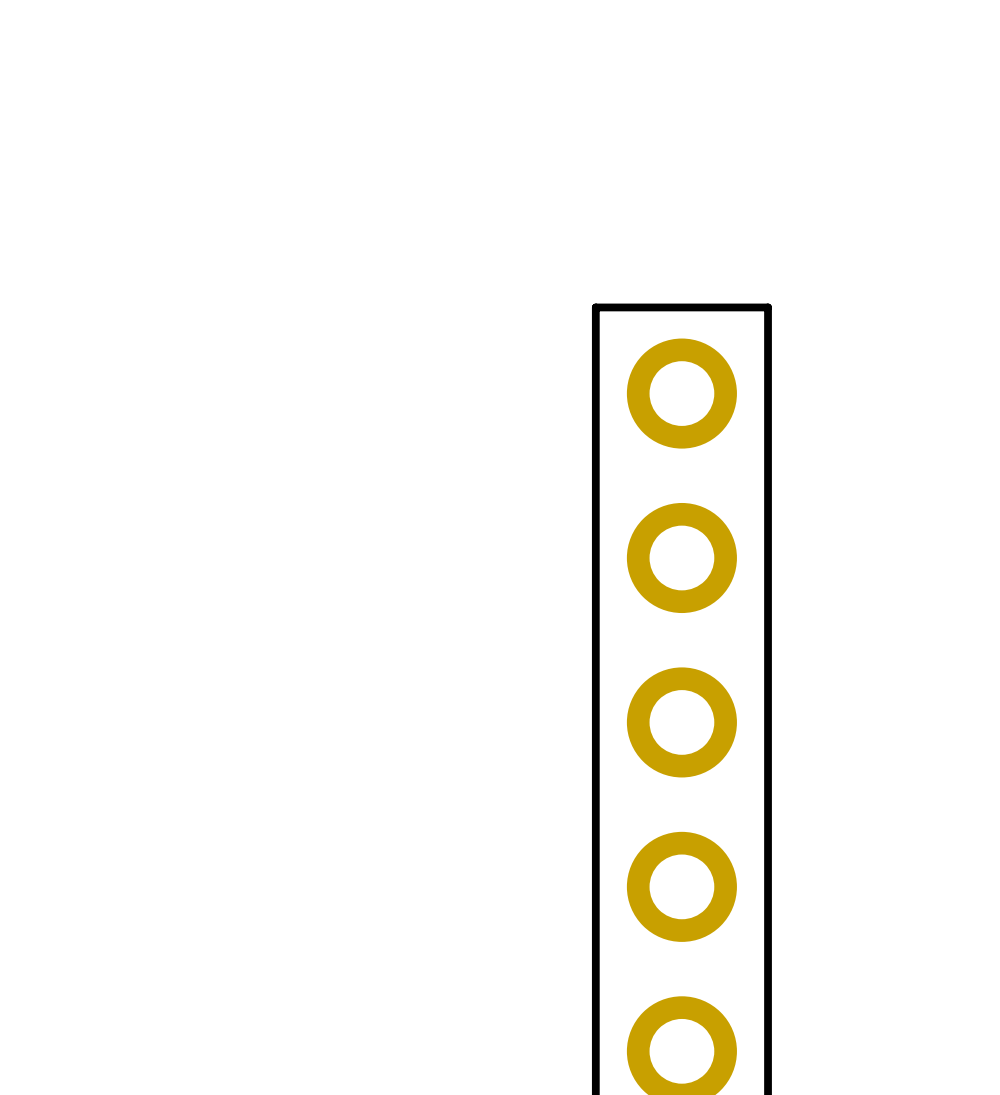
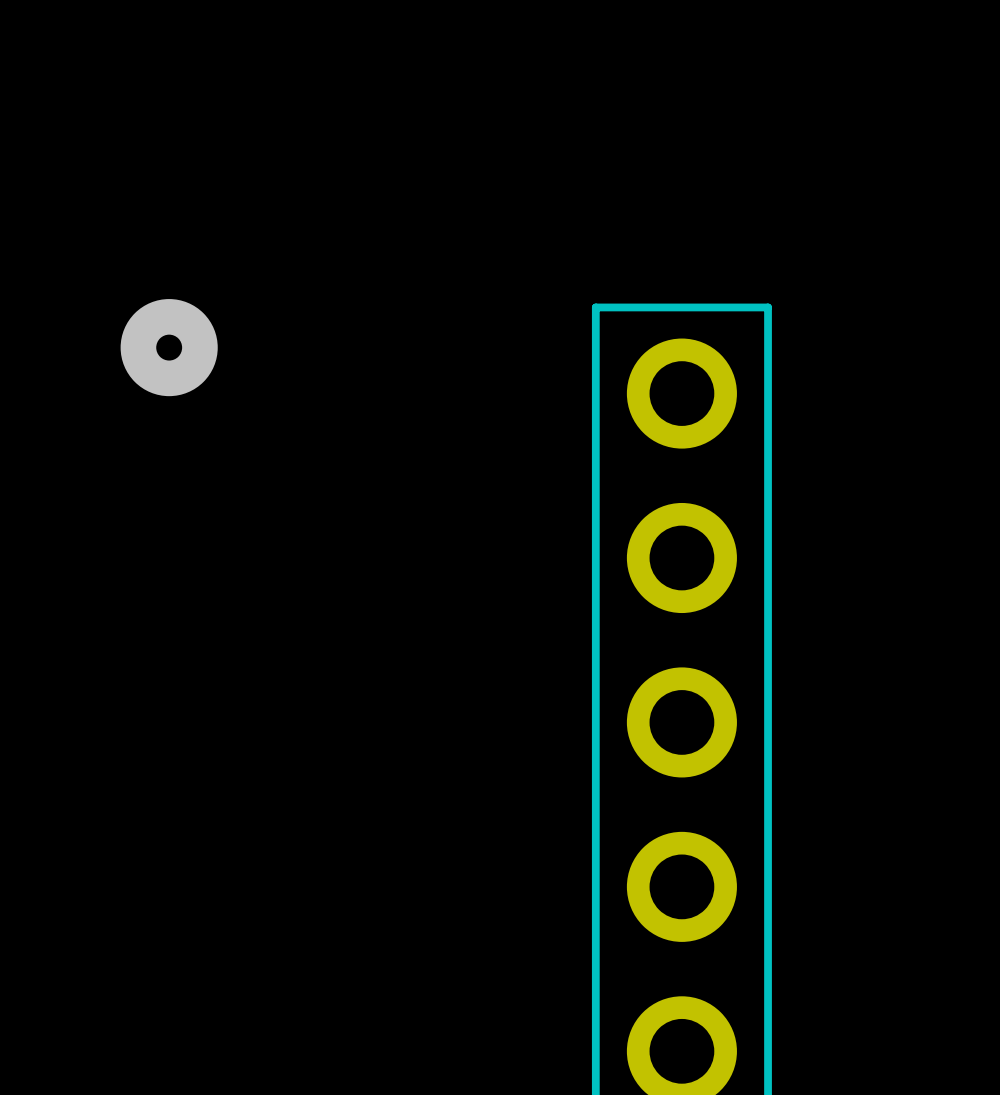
via: none -> (169, 347)

